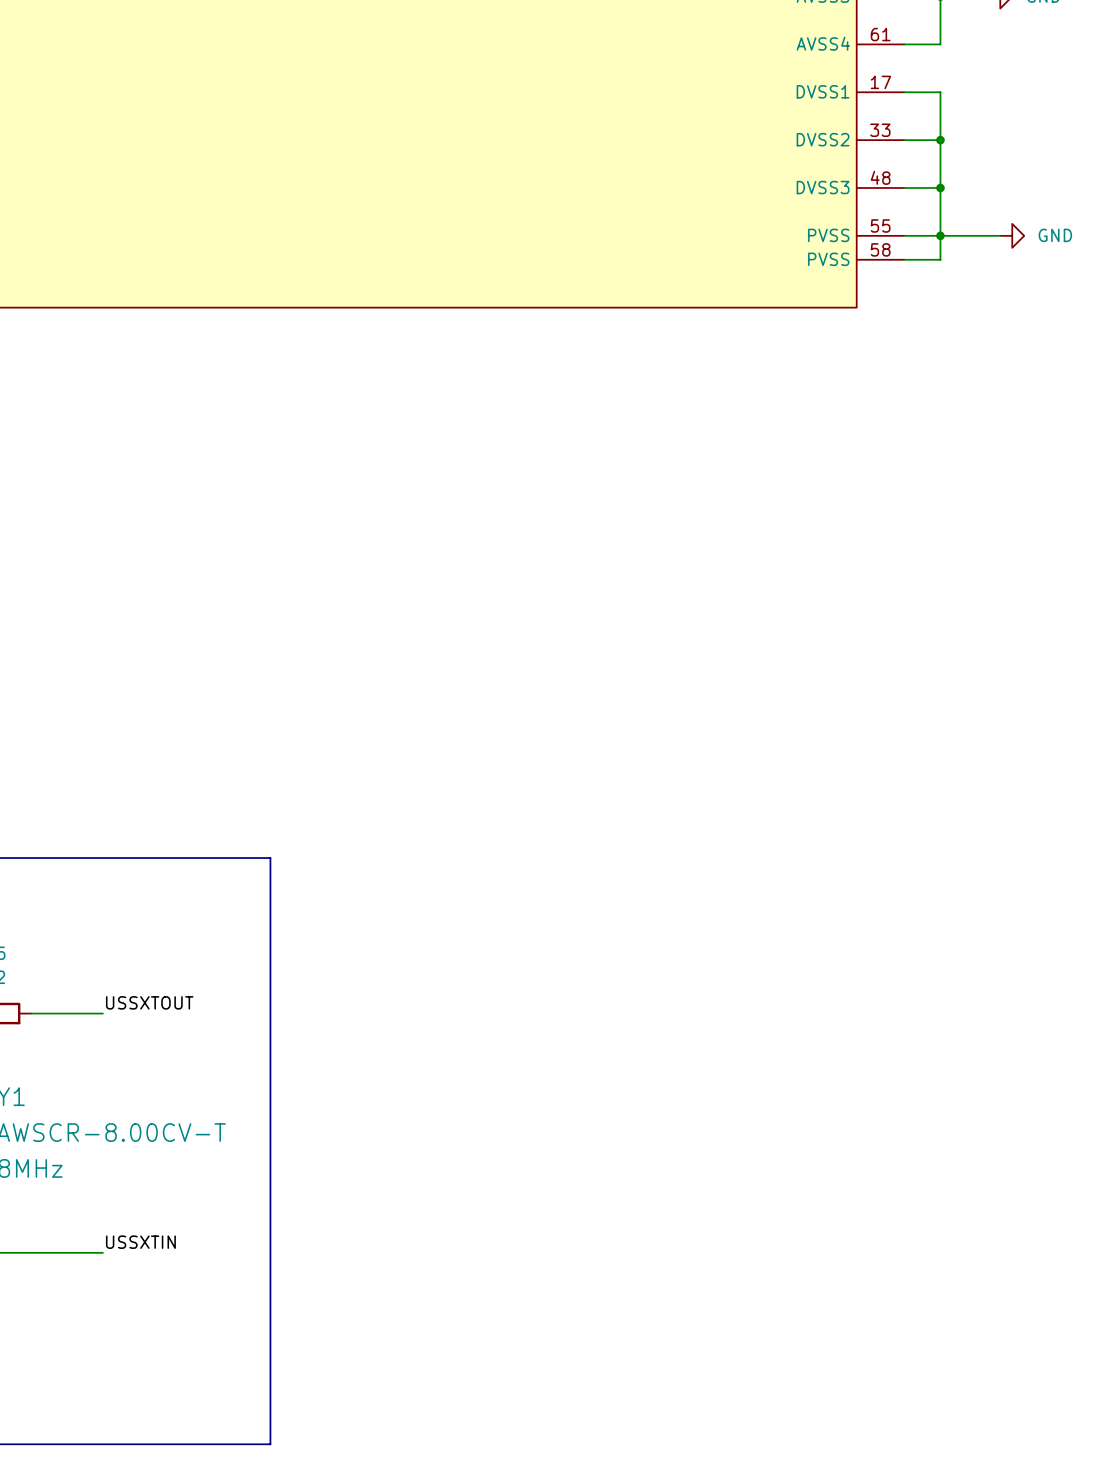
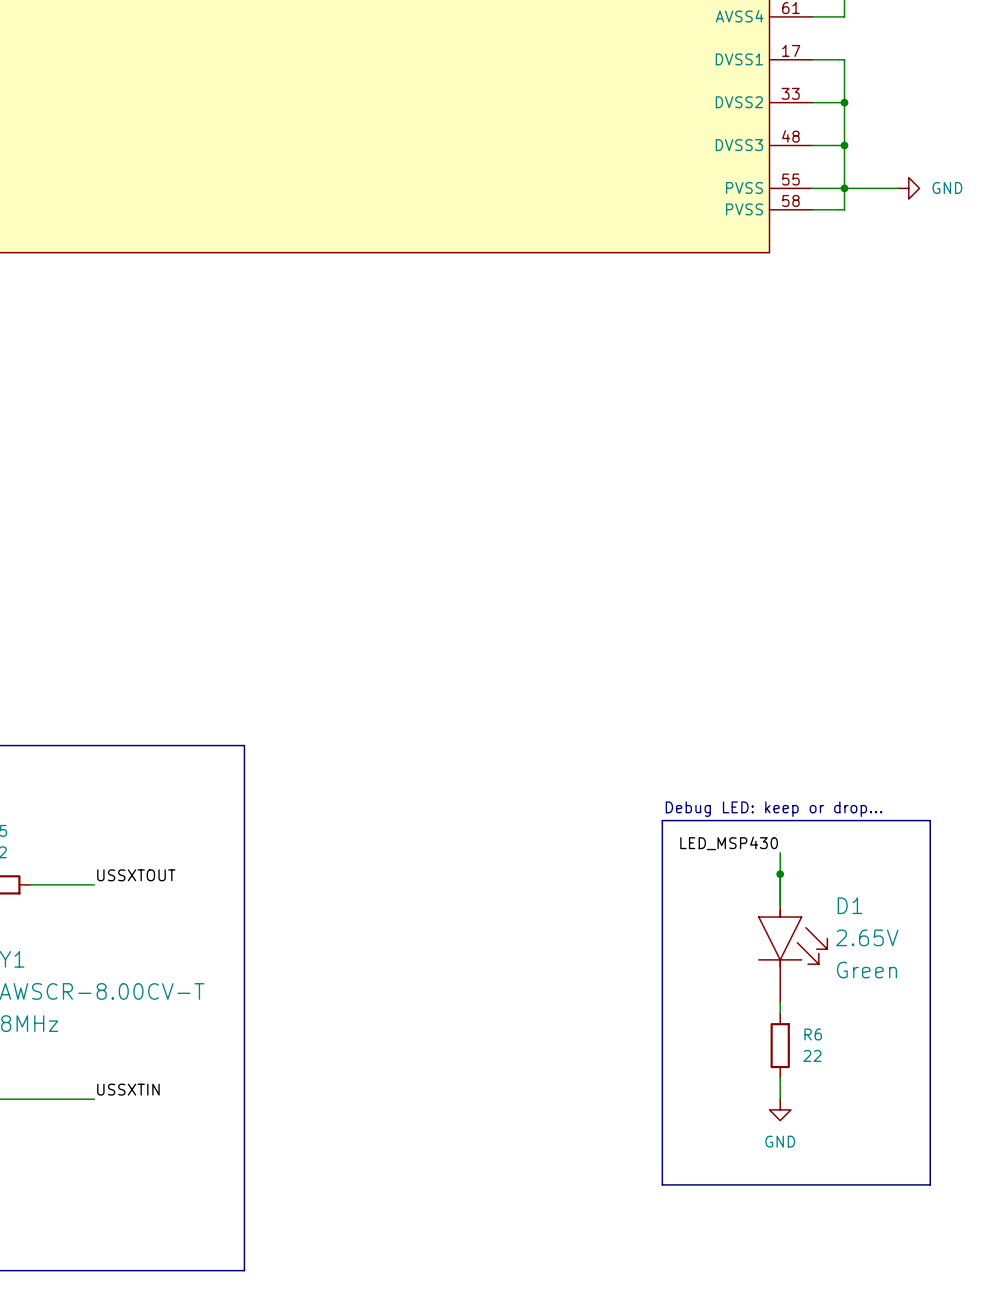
text: none -> Debug LED: keep or drop... (774, 809)
line: none -> (662, 820) (930, 820) (930, 1184) (662, 1184) (662, 820)
label: none -> LED_MSP430 (729, 843)
wire: none -> (780, 852) (780, 906)
junction: none -> (780, 874)
D1: none -> (793, 938)
wire: none -> (780, 1002) (780, 1013)
R6: none -> 22 (780, 1045)
wire: none -> (780, 1077) (780, 1099)
power symbol: none -> GND (780, 1109)

